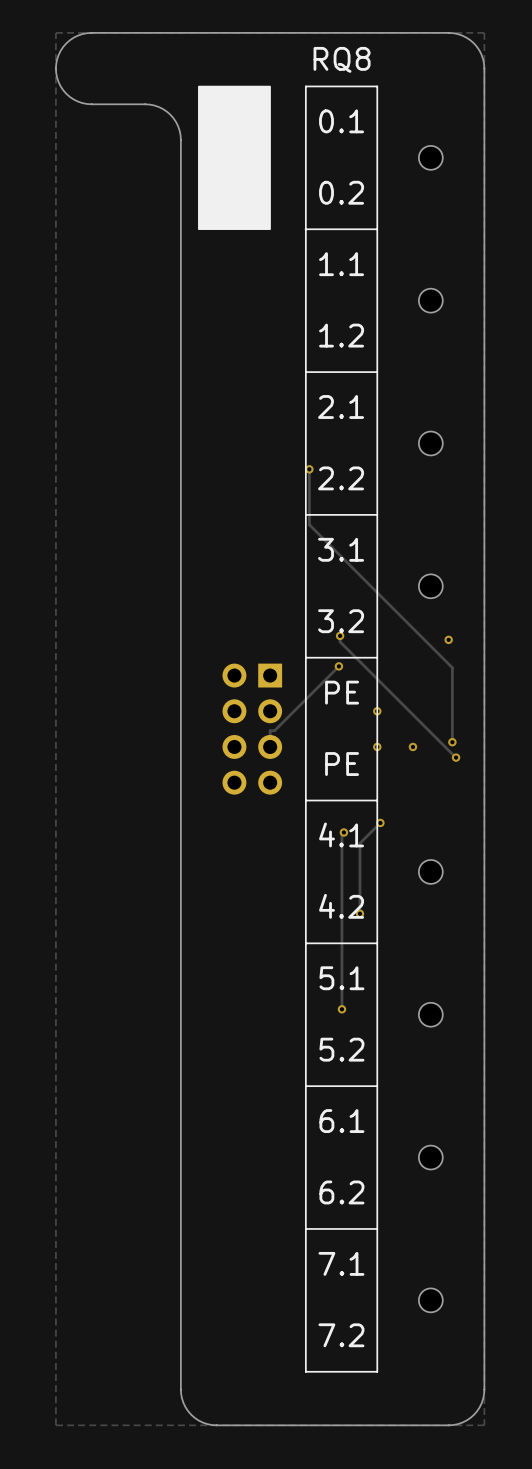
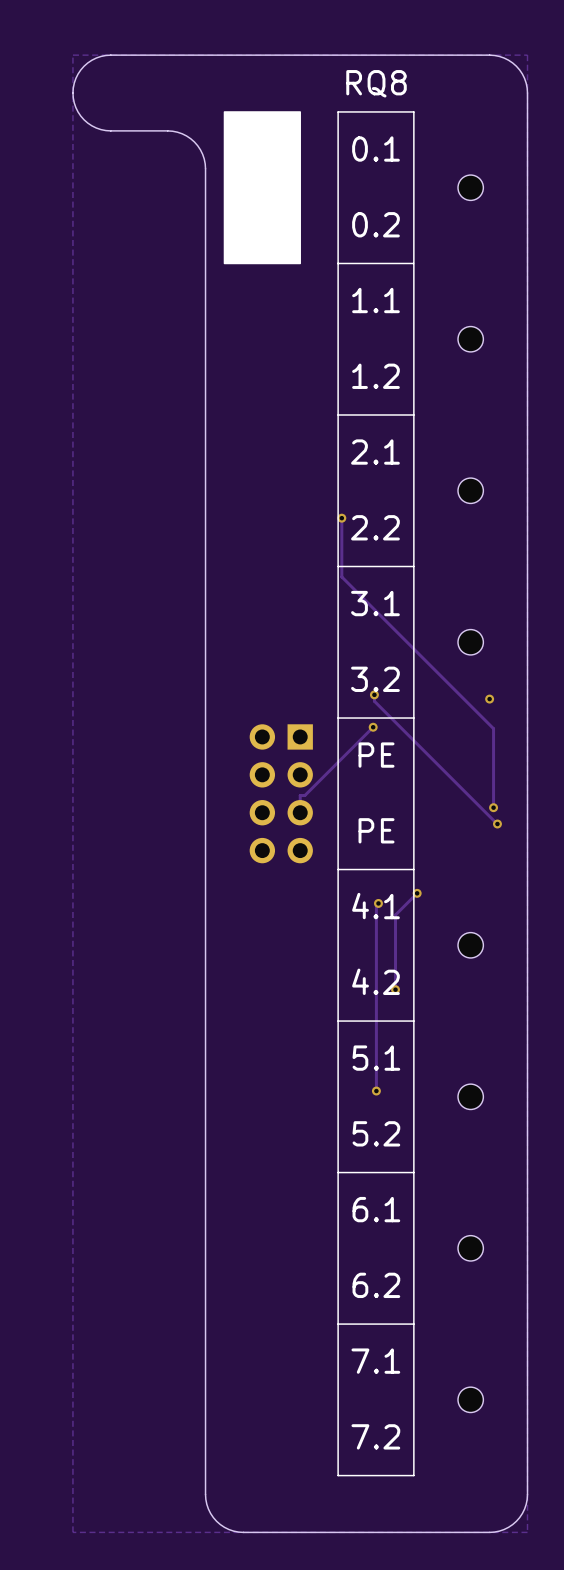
via: (377, 711) -> none
via: (377, 746) -> none
via: (412, 746) -> none

